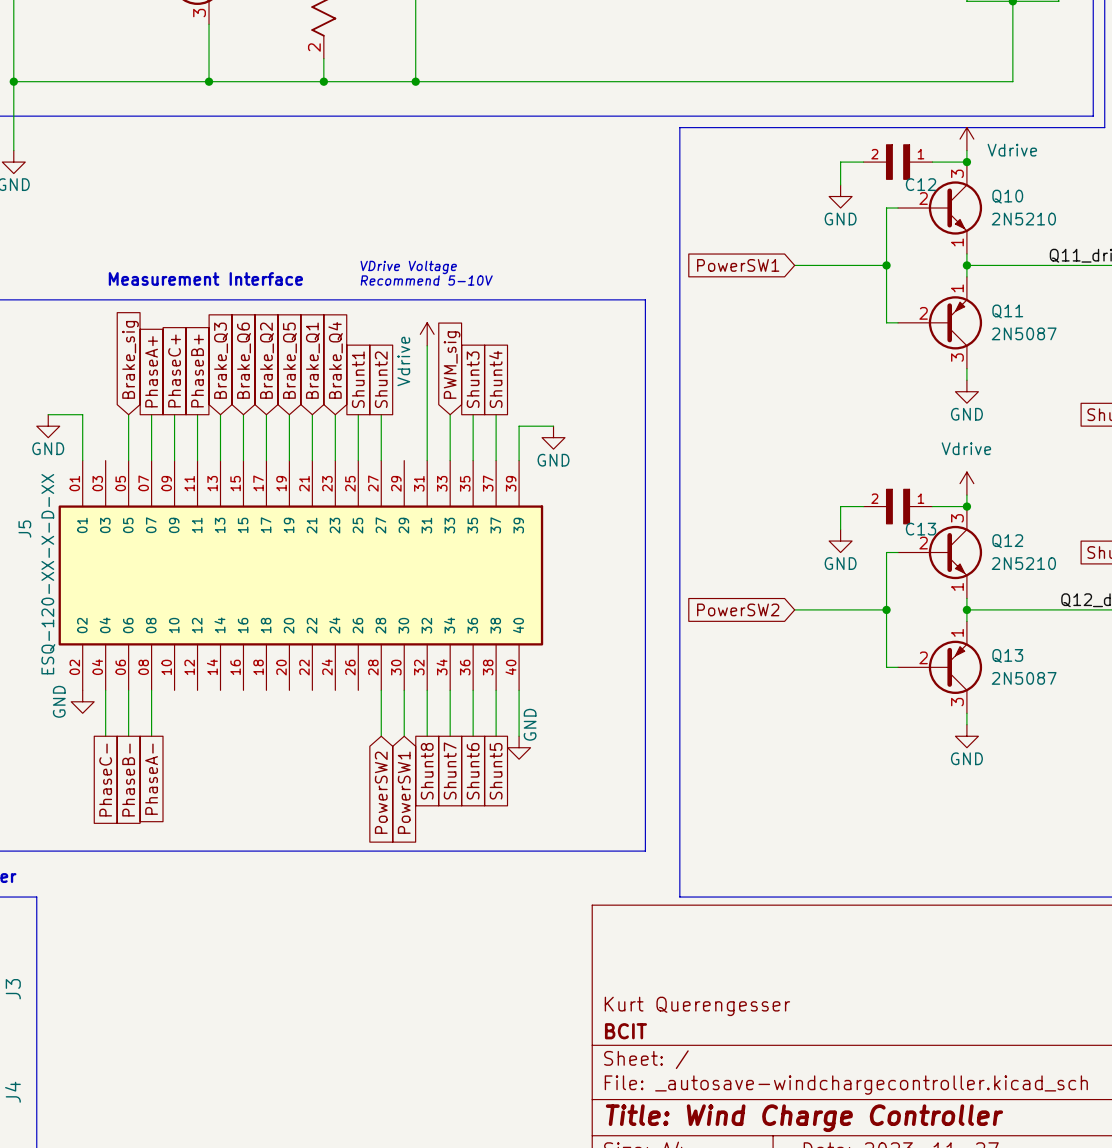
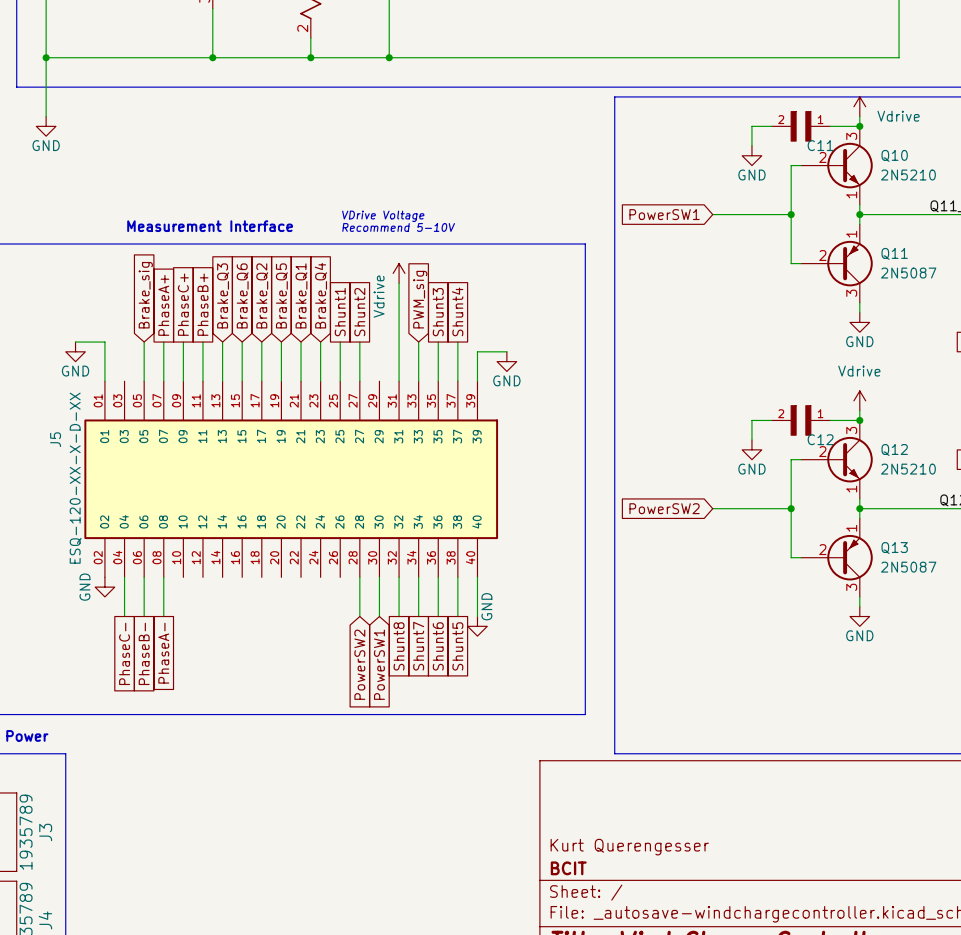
C12 name: C12 (920, 184) -> C11 (820, 145)
C13 name: C13 (920, 529) -> C12 (820, 439)

